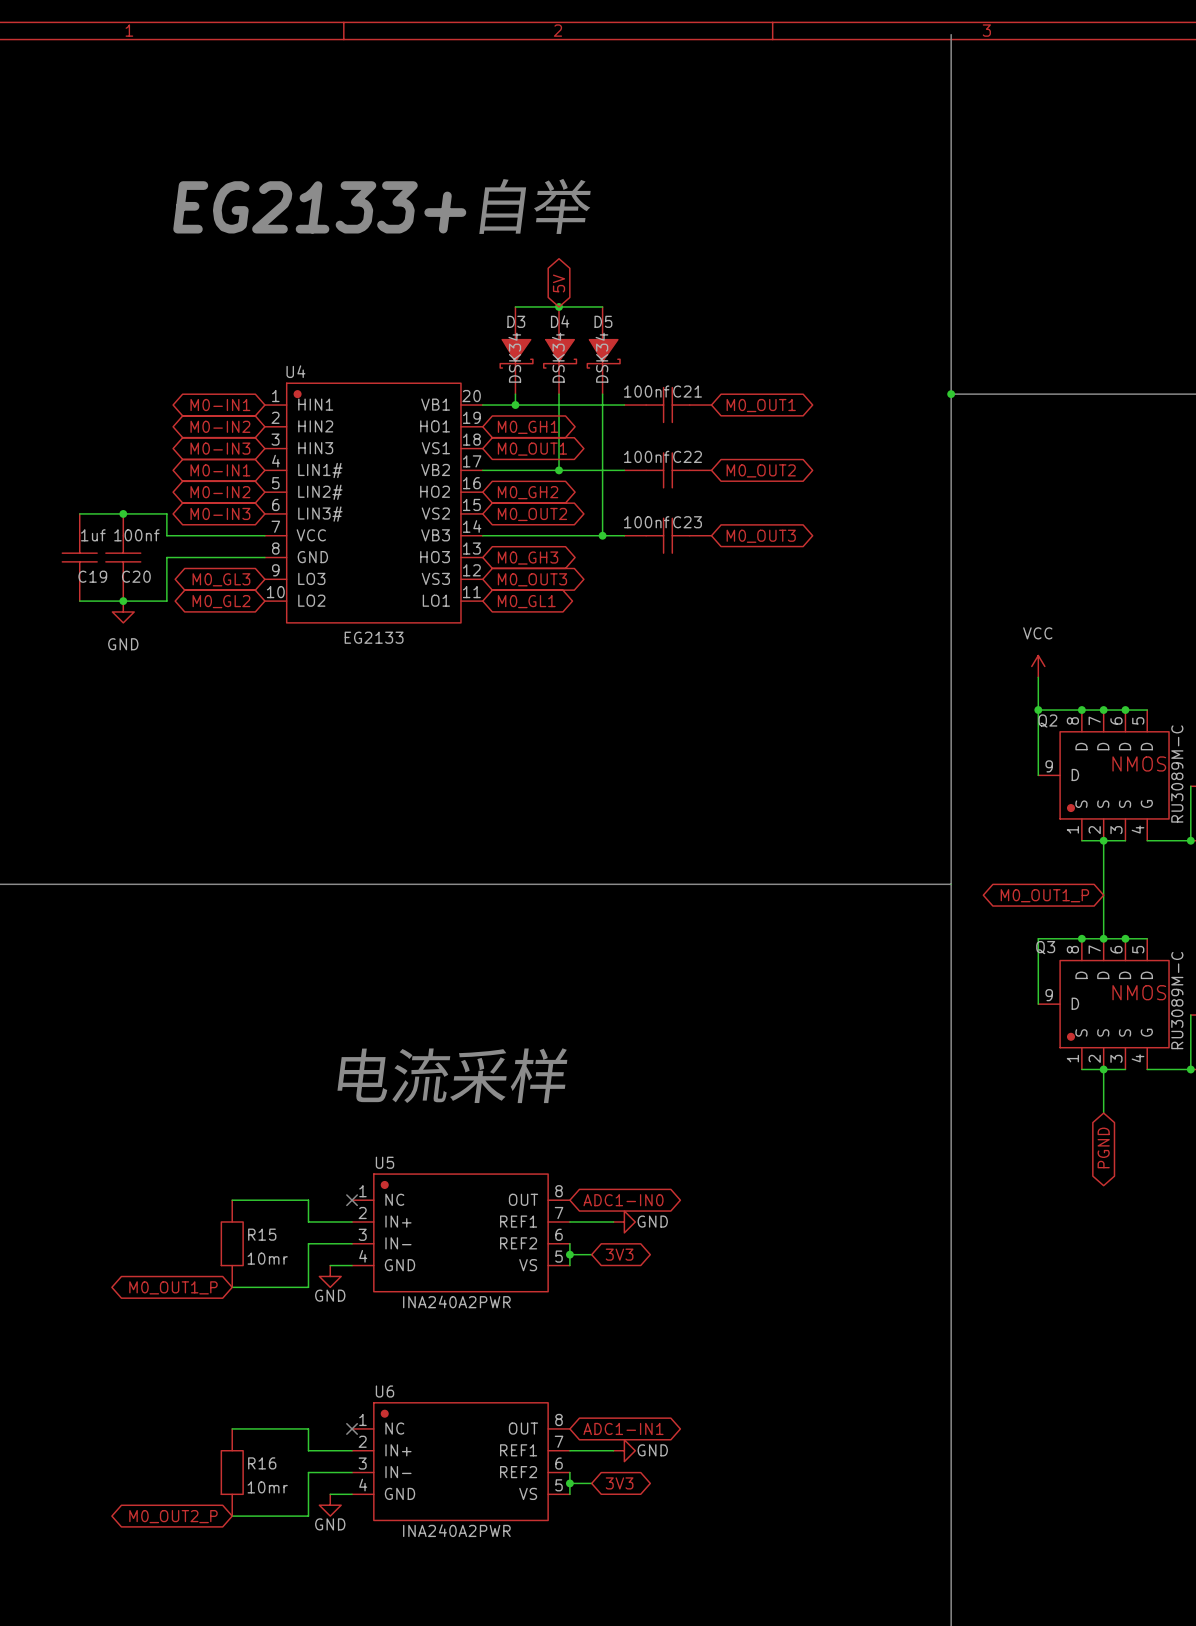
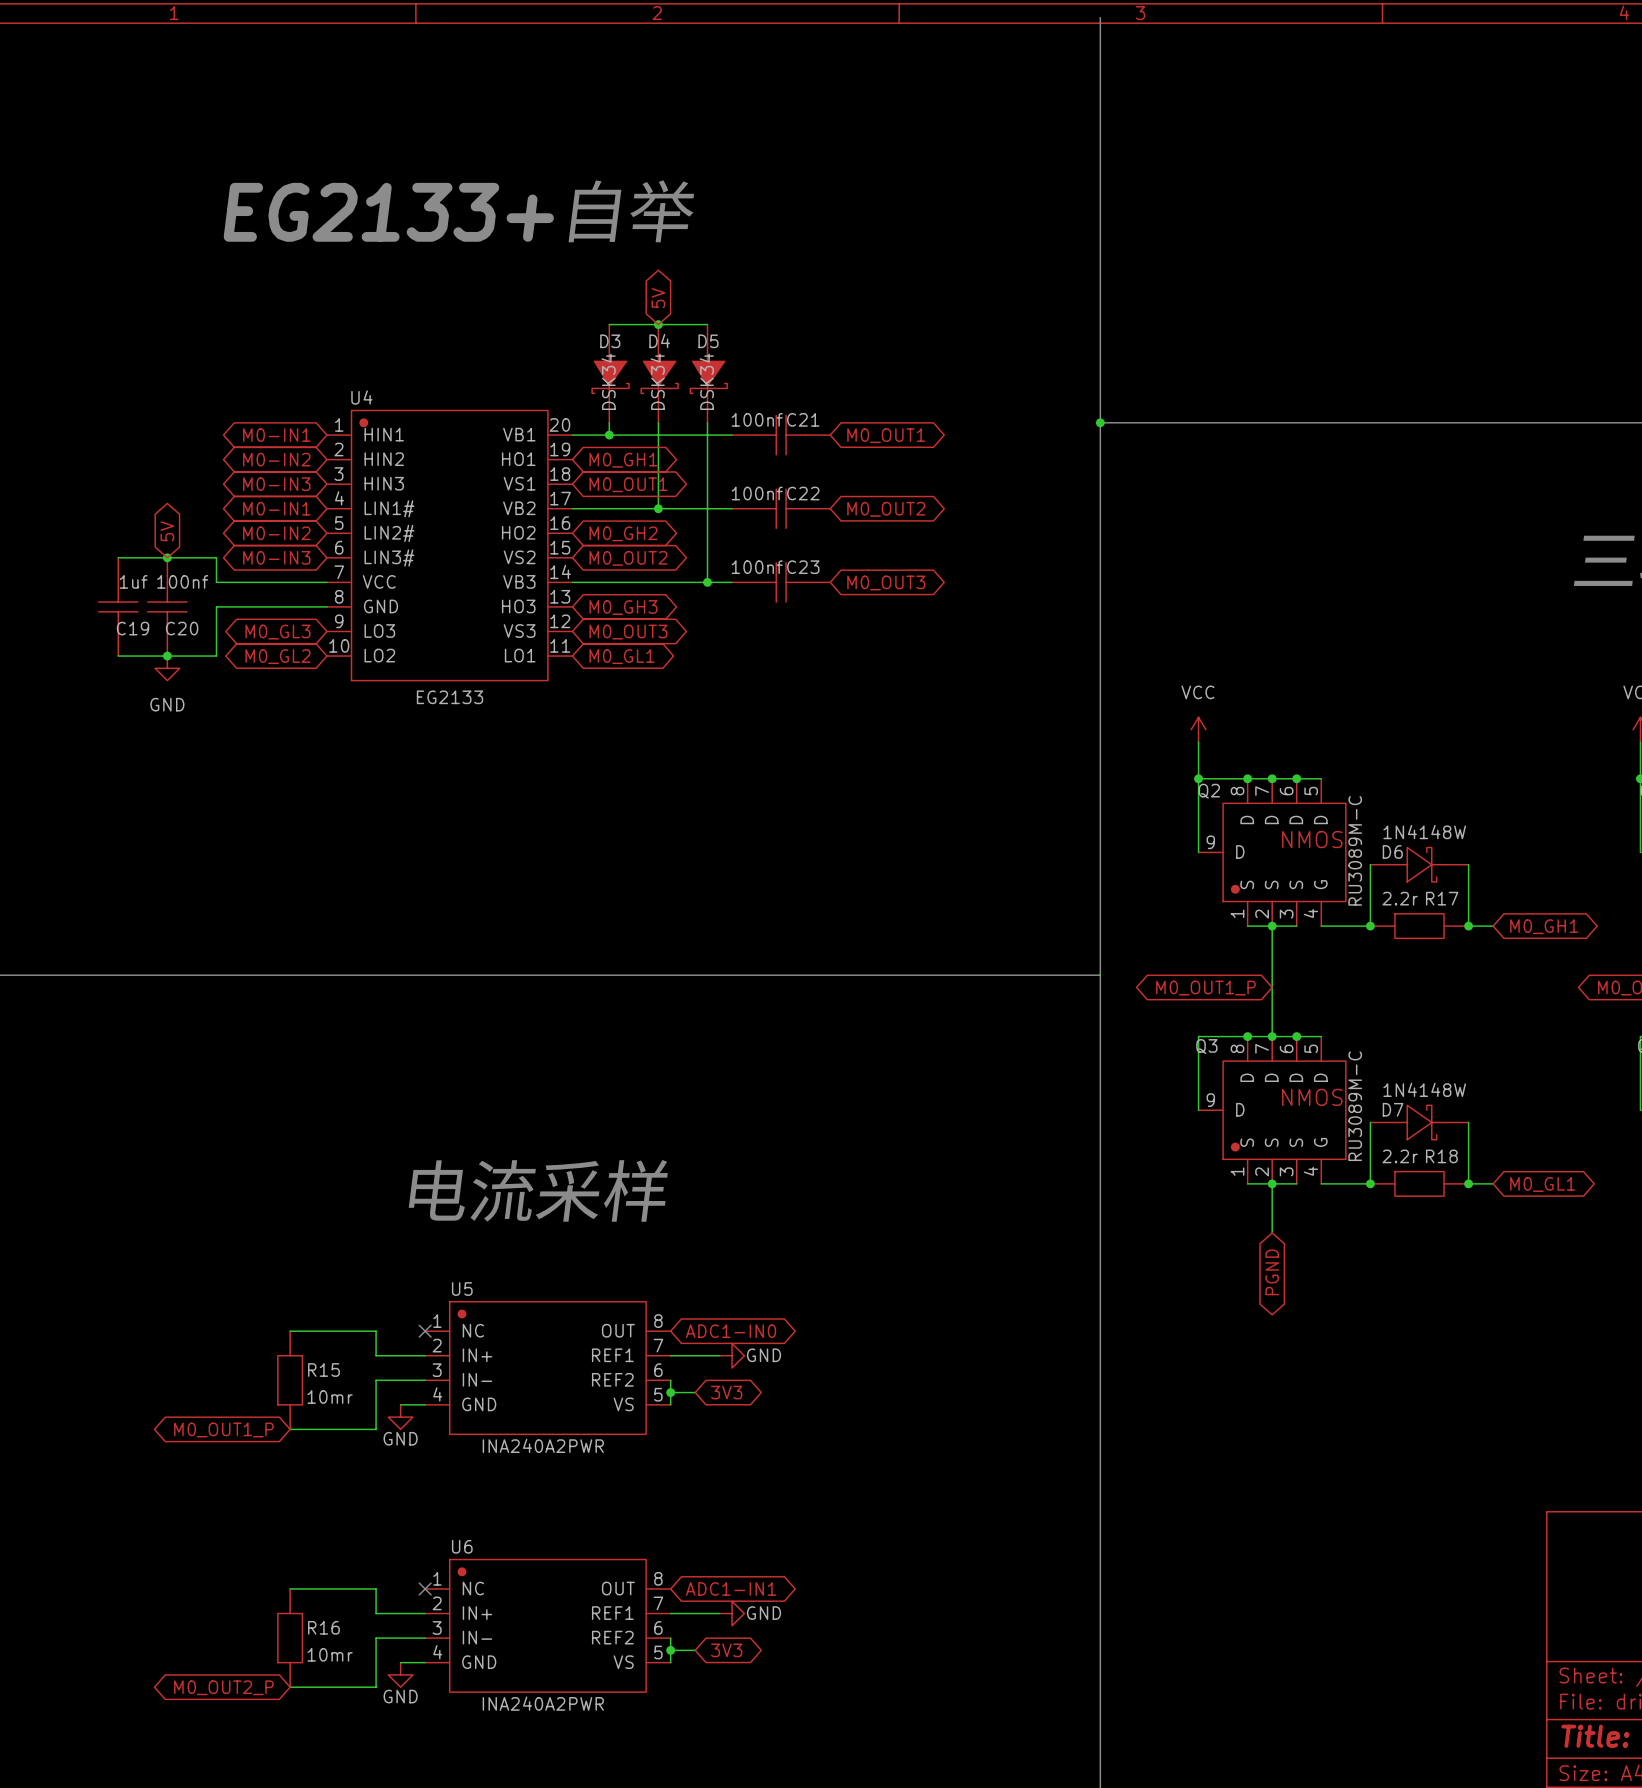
global label: none -> 5V (167, 531)

